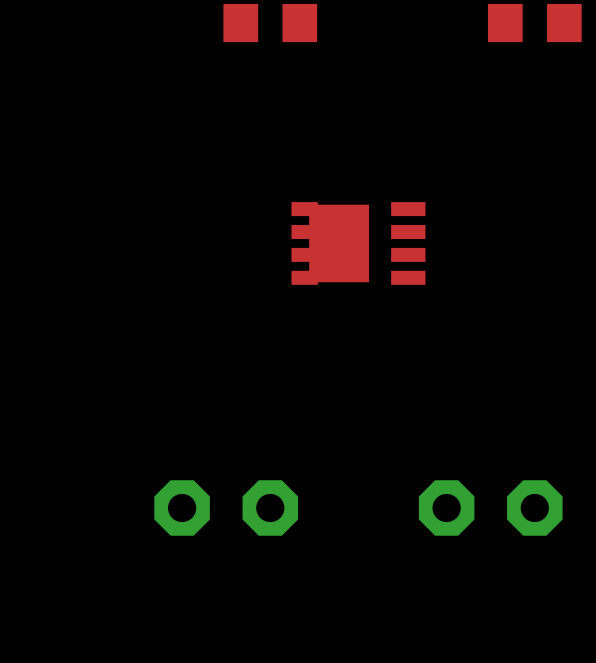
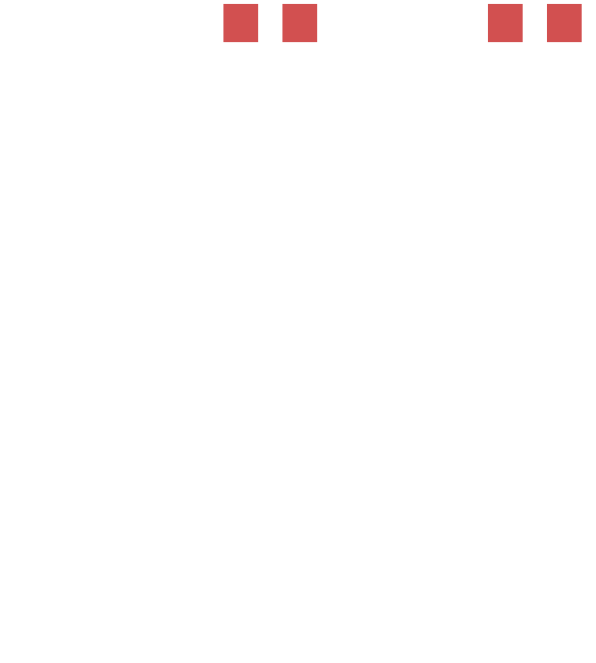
part: (358, 243) -> none
part: (226, 507) -> none
part: (490, 507) -> none

